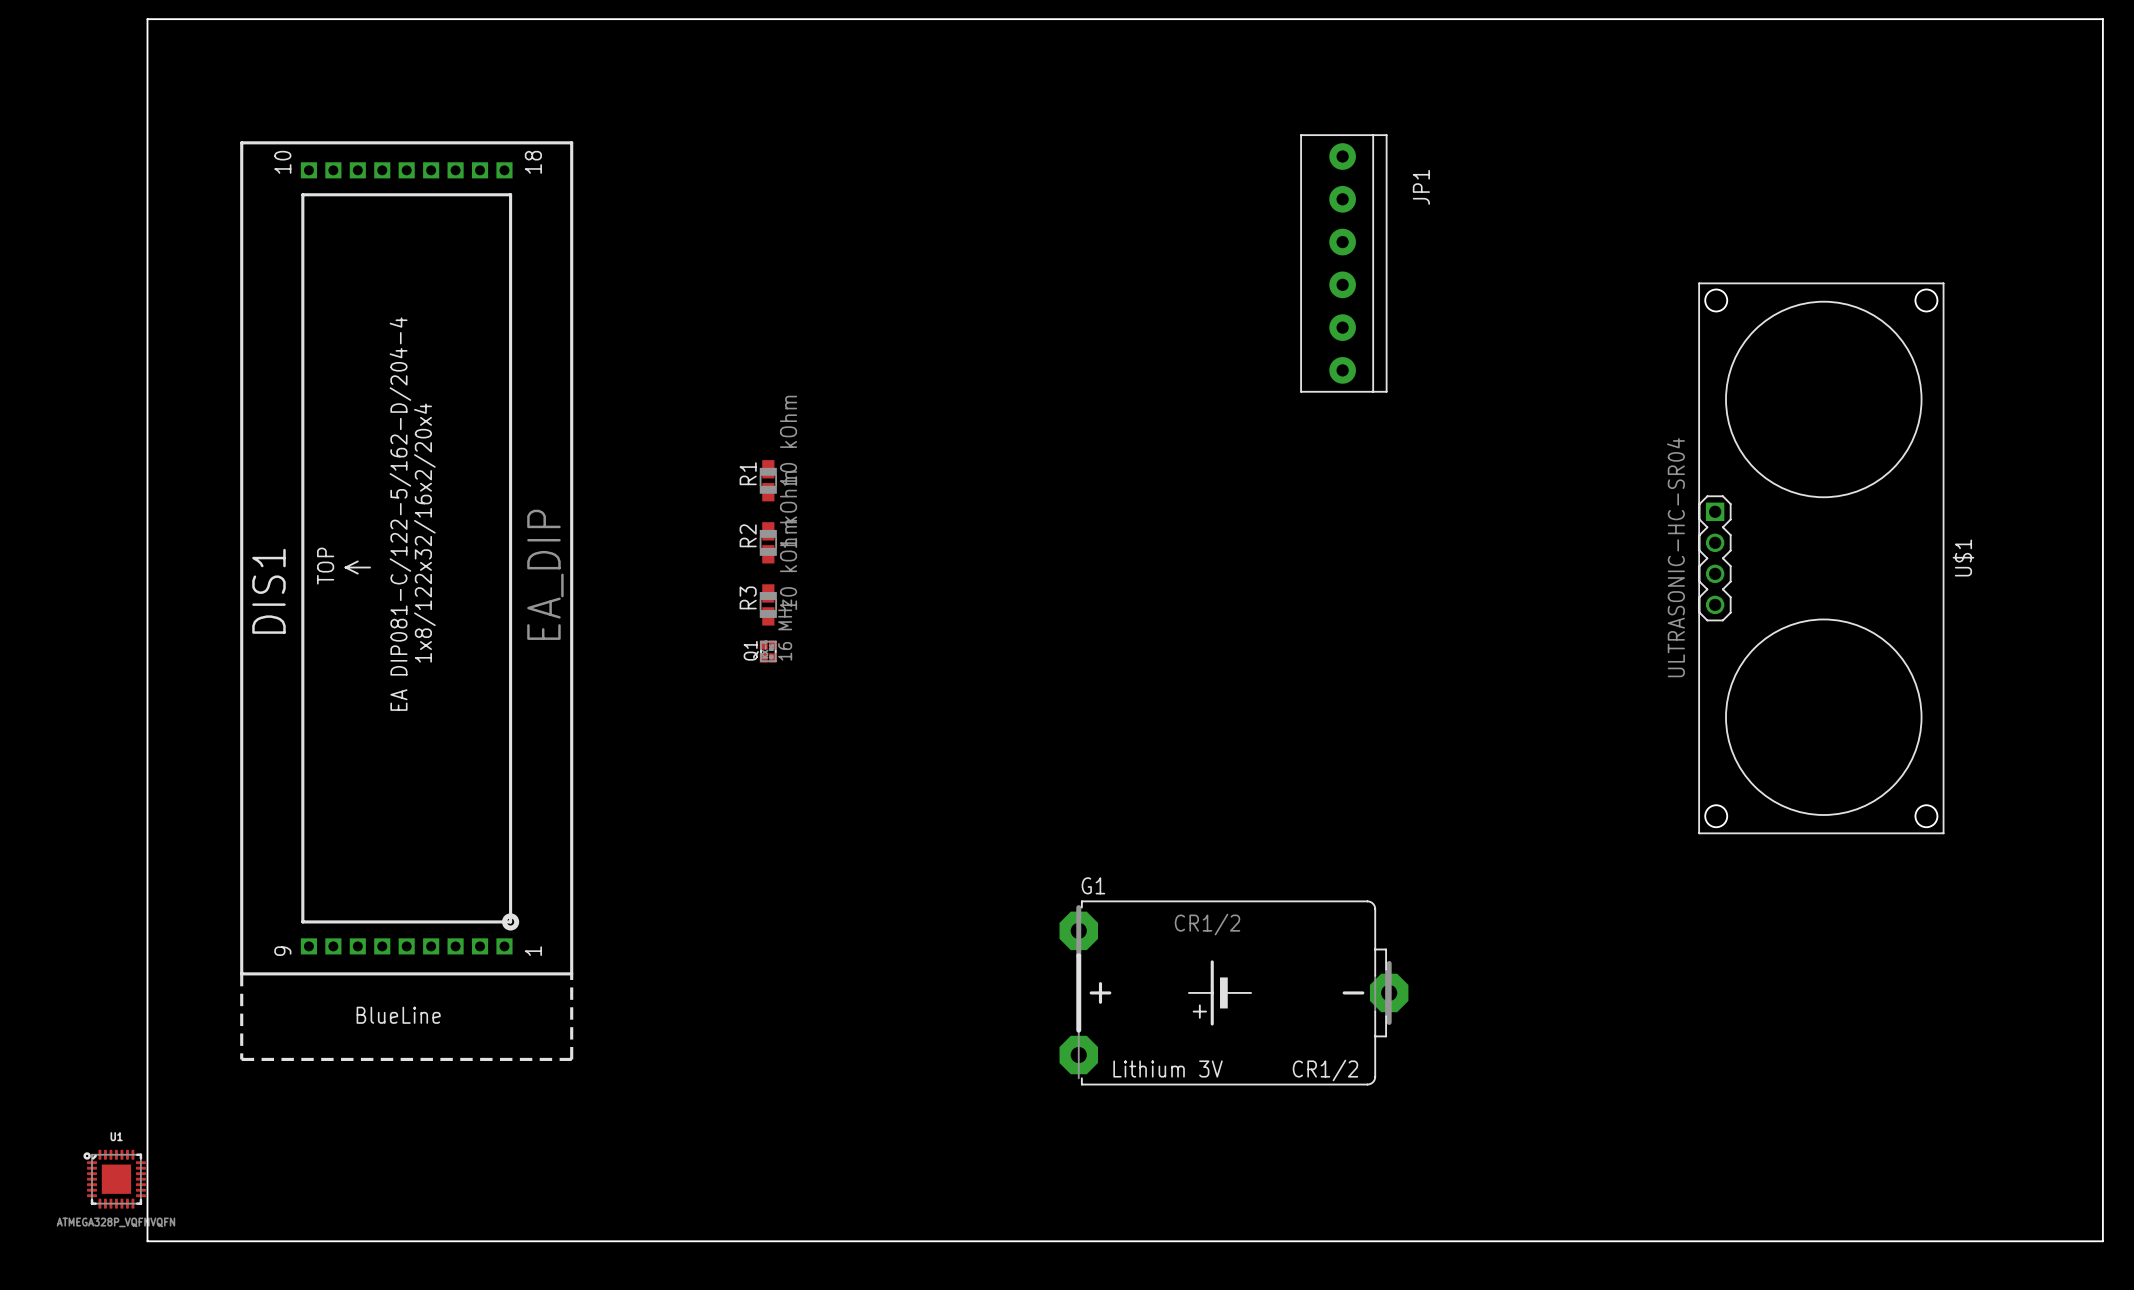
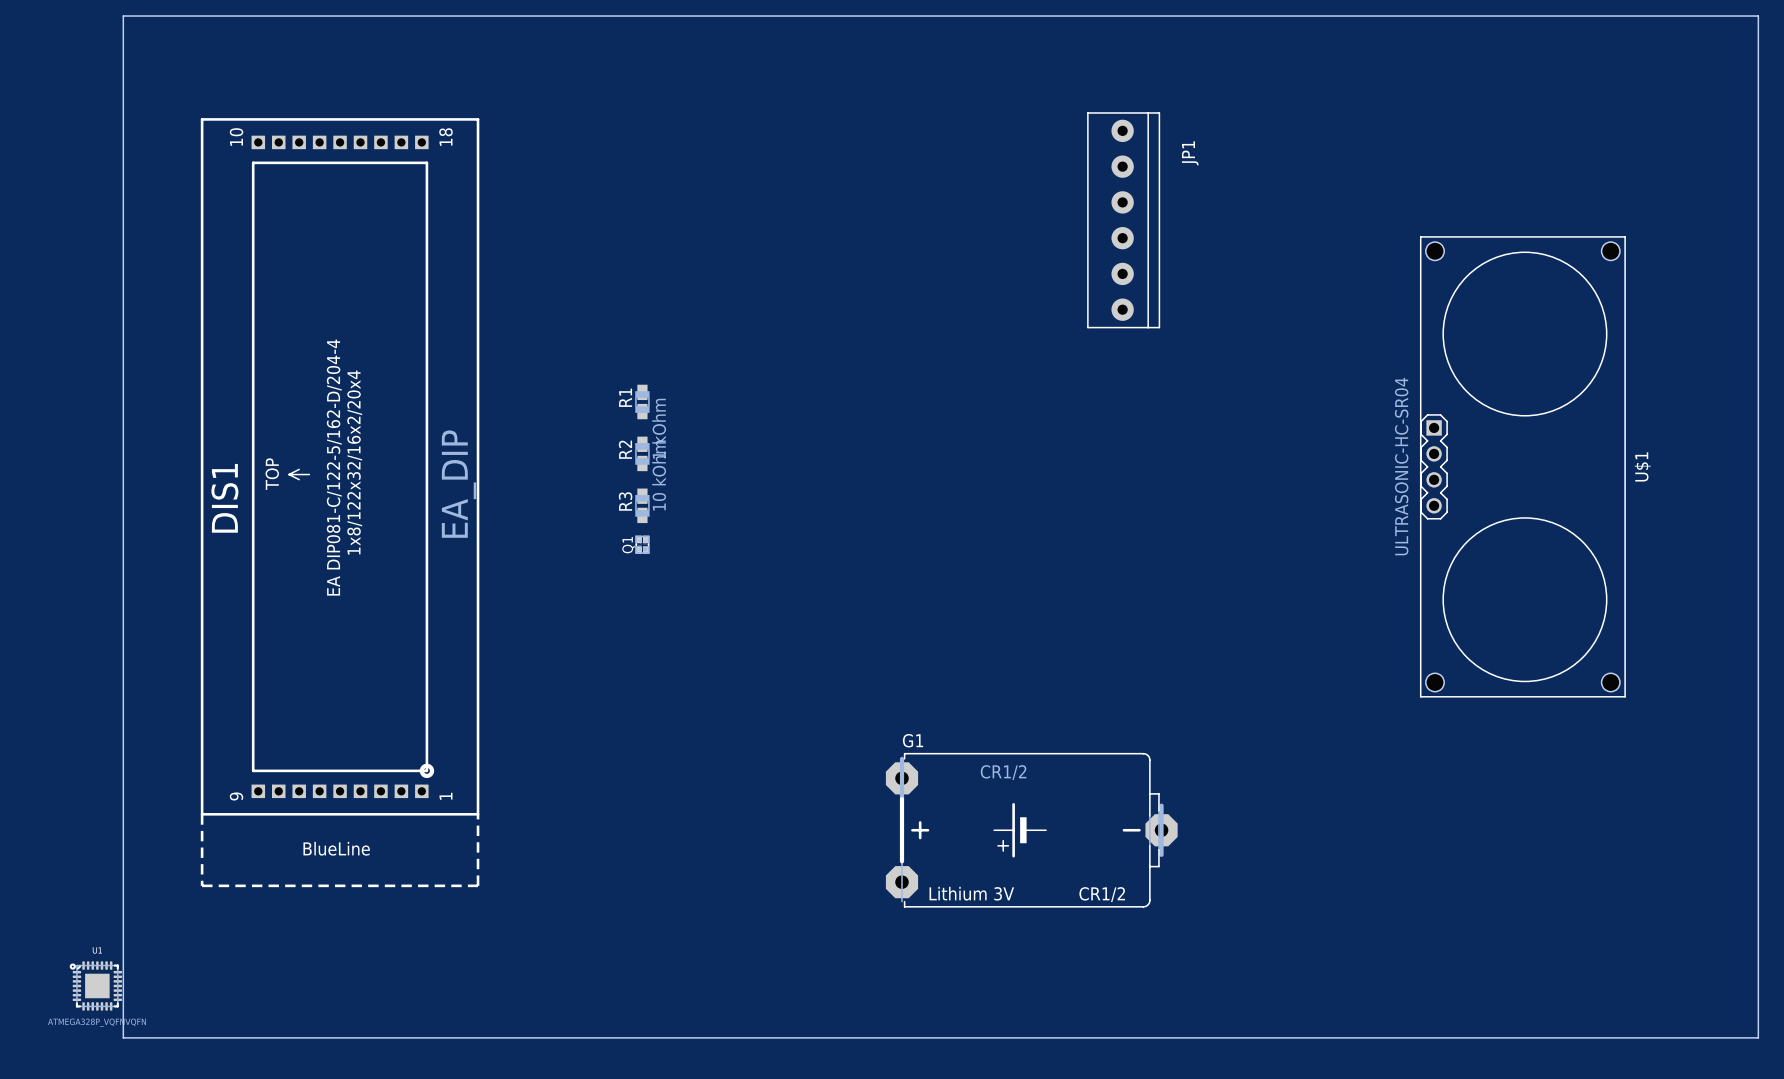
R1 value: 10 kOhm (788, 440) -> none
Q1 value: 16 MHz (785, 630) -> none

